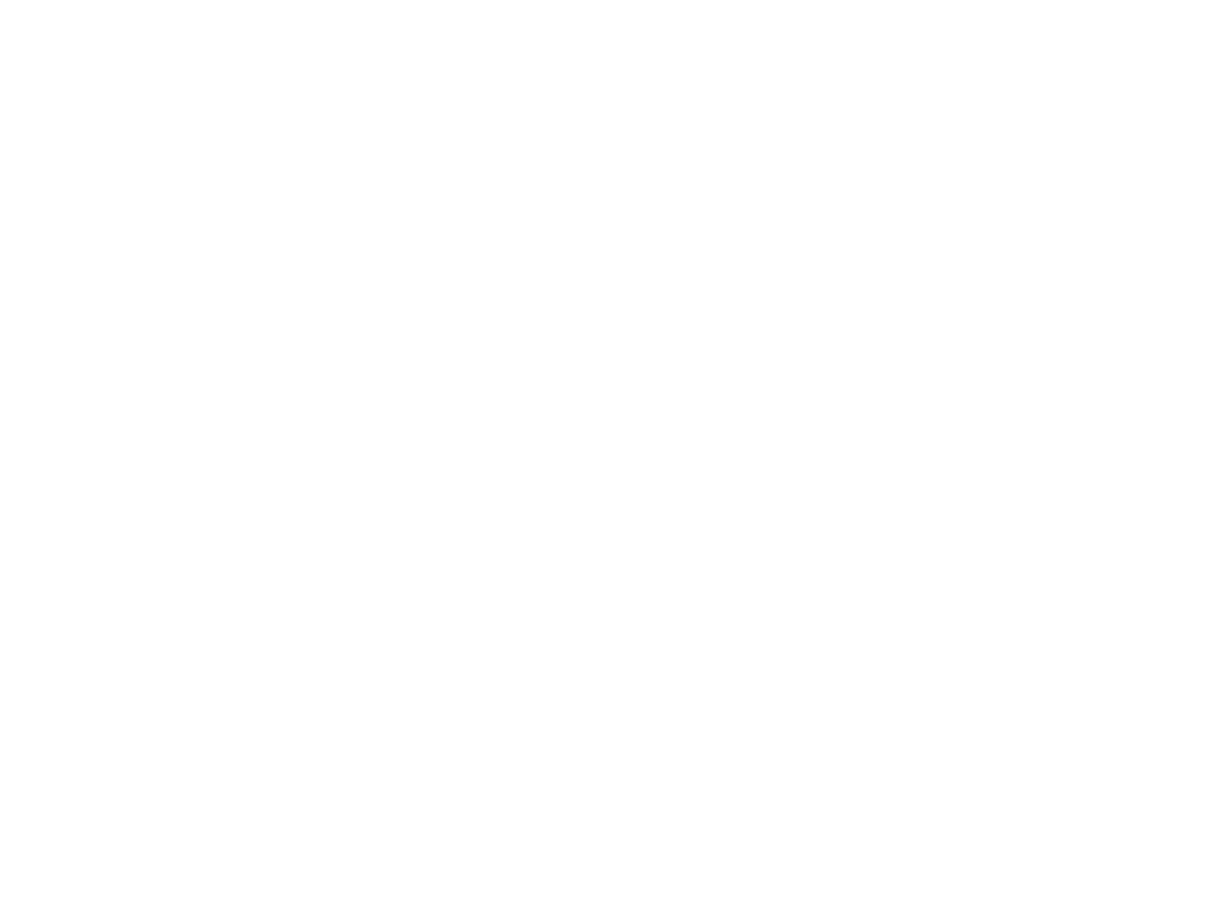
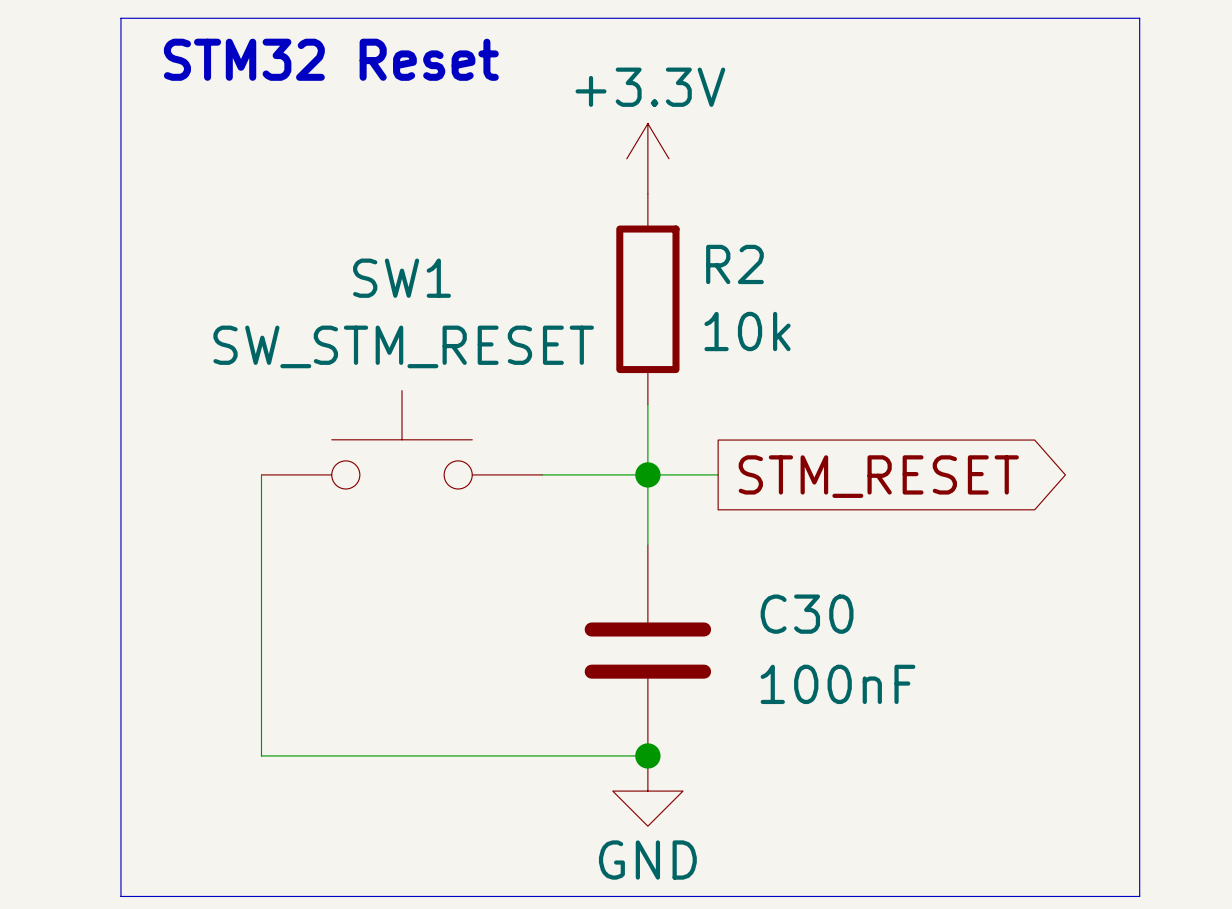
line: none -> (120, 18) (1139, 18) (1139, 896) (120, 896) (120, 18)
text: none -> STM32 Reset (331, 59)
power symbol: none -> +3.3V (647, 158)
R2: none -> 10k (647, 299)
wire: none -> (647, 404) (647, 545)
SW1: none -> SW_STM_RESET (401, 439)
wire: none -> (261, 474) (261, 755) (647, 755)
wire: none -> (542, 474) (718, 474)
junction: none -> (647, 474)
global label: none -> STM_RESET (878, 476)
C30: none -> 100nF (647, 650)
junction: none -> (647, 755)
power symbol: none -> GND (647, 791)

